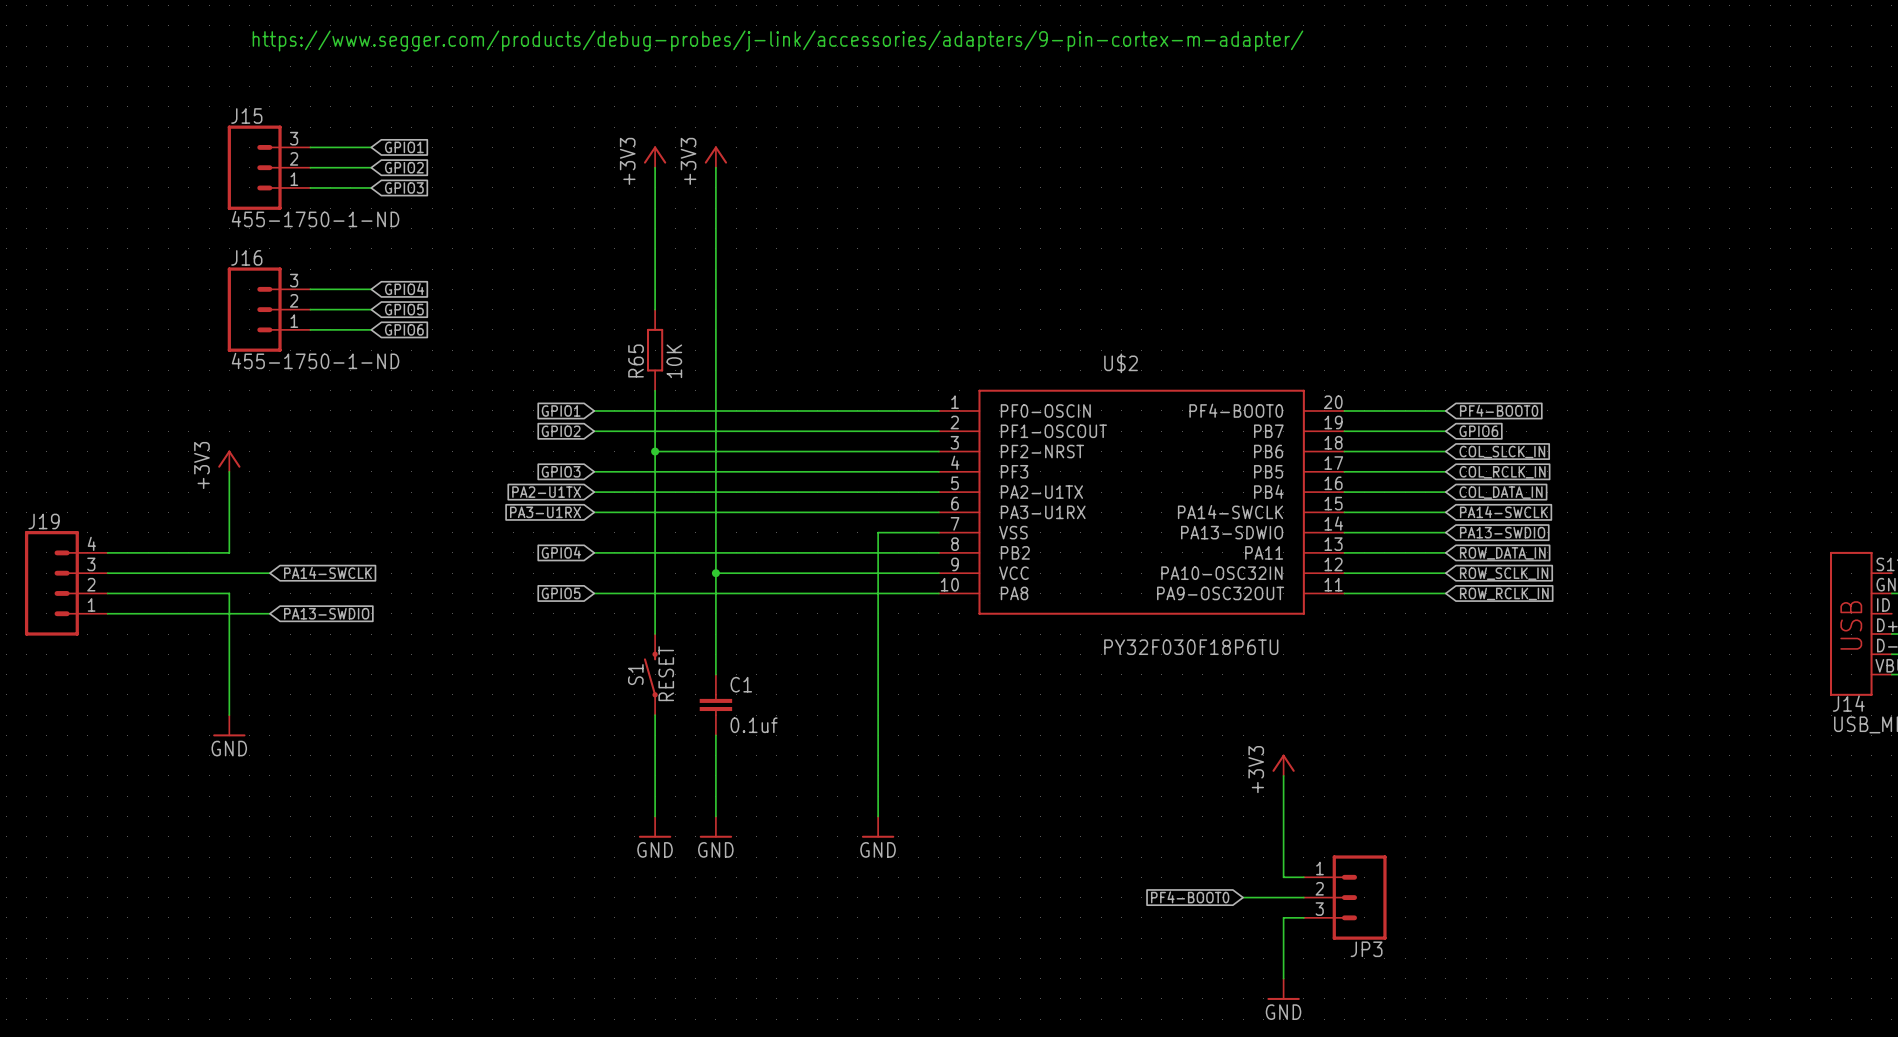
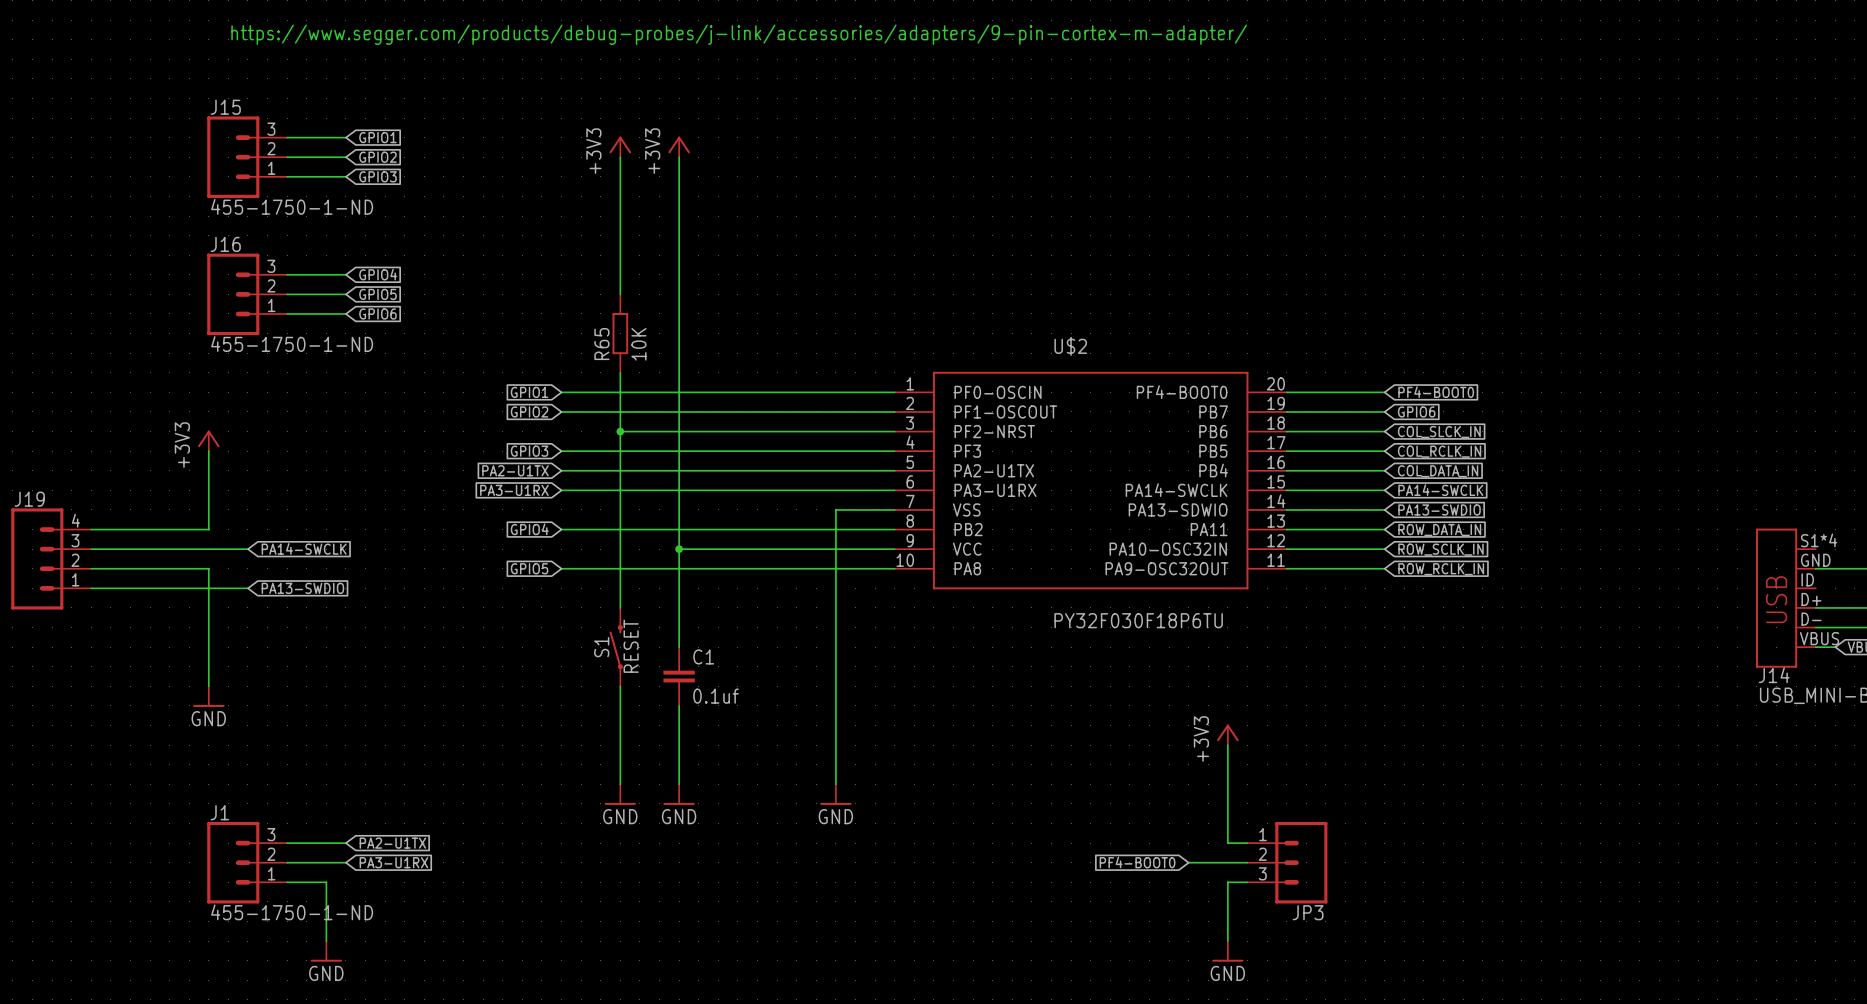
wire: none -> (287, 843) (345, 843)
global label: none -> PA2-U1TX (392, 843)
J1: none -> 455-1750-1-ND (247, 862)
wire: none -> (287, 862) (345, 862)
global label: none -> PA3-U1RX (393, 862)
wire: none -> (287, 882) (326, 882) (326, 941)
power symbol: none -> GND (326, 951)

